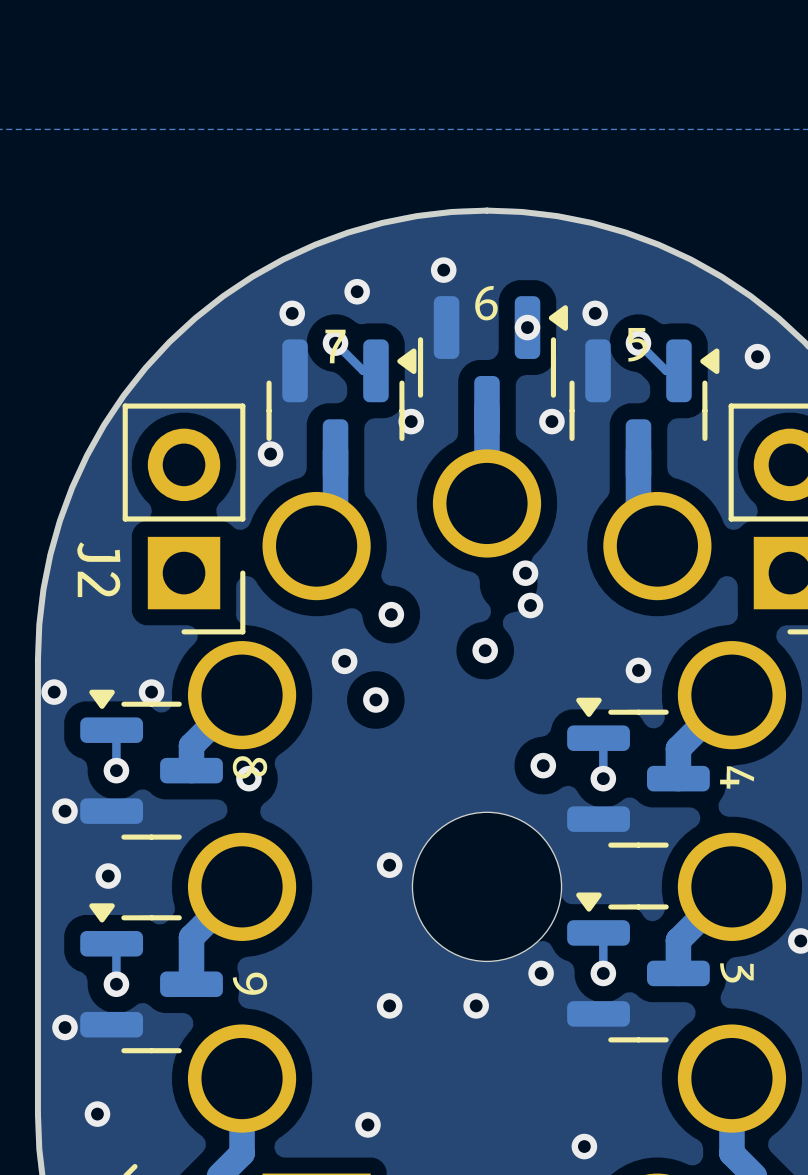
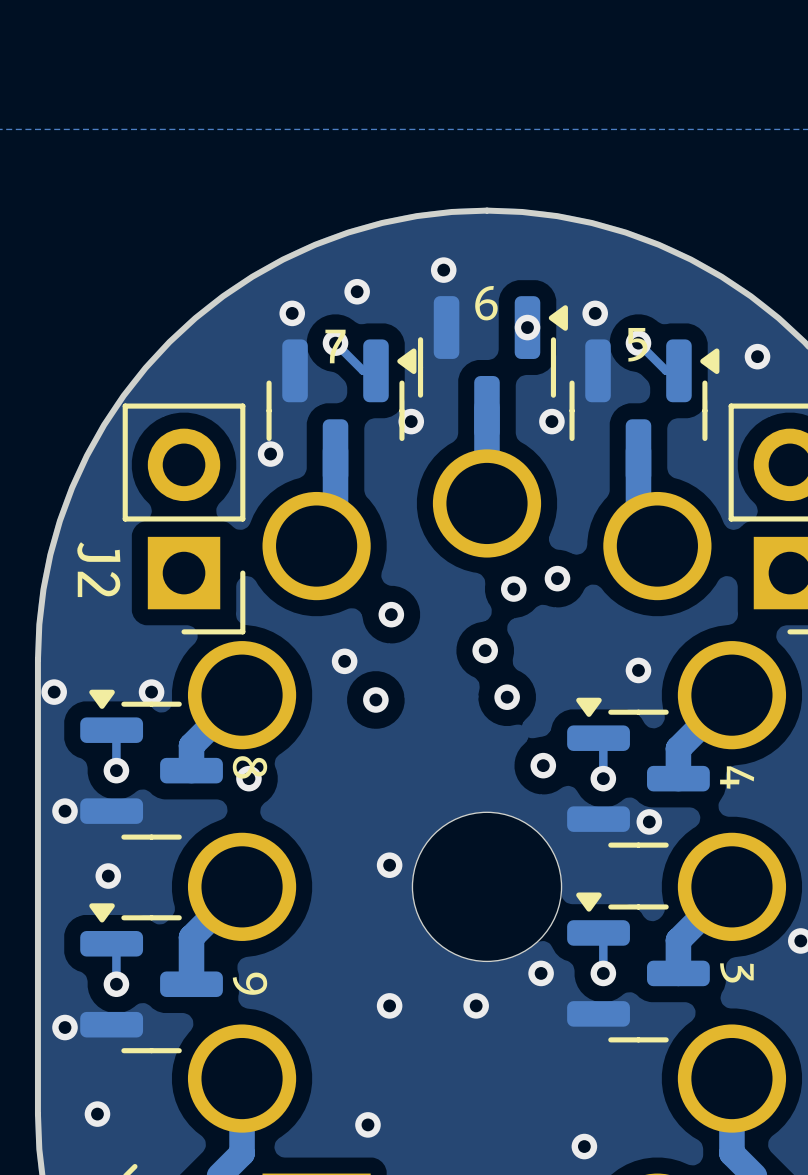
via: (525, 573) -> none
via: none -> (557, 578)
via: none -> (513, 589)
via: (530, 605) -> none
via: none -> (507, 697)
via: none -> (649, 821)

